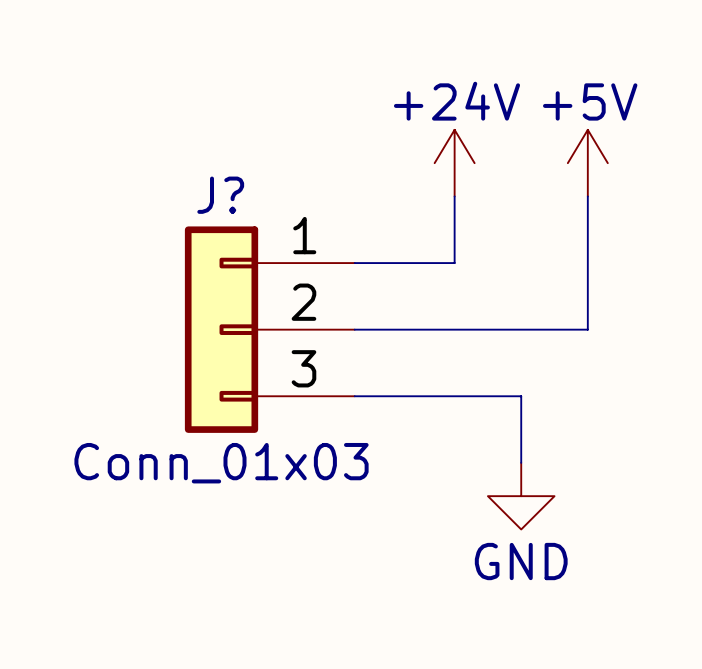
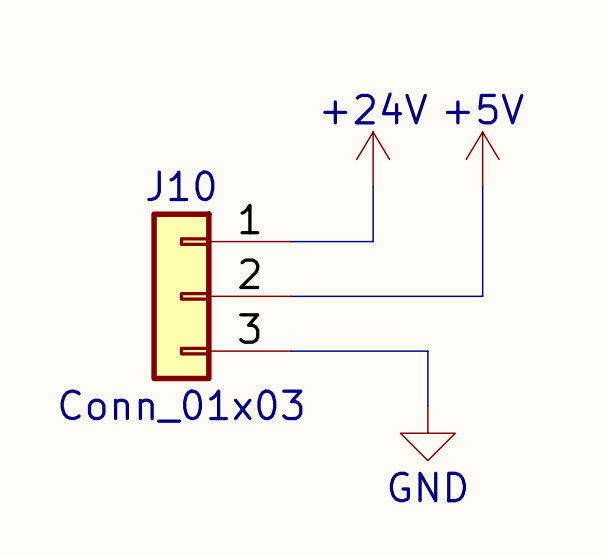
J? name: J? (220, 195) -> J10 (180, 185)

